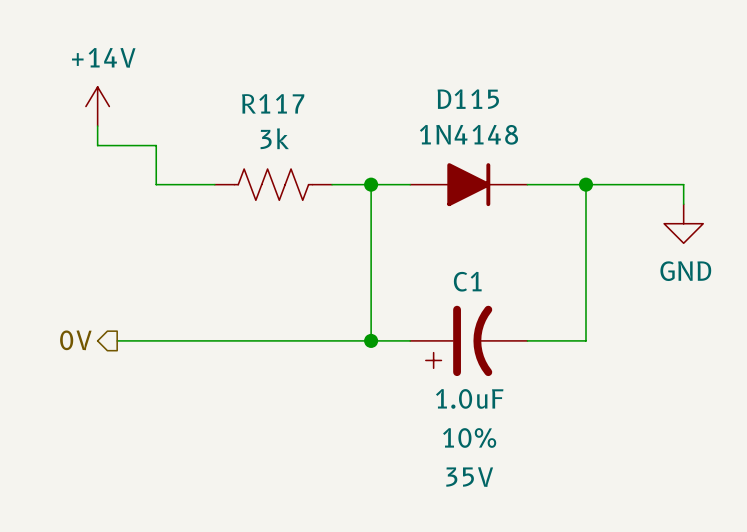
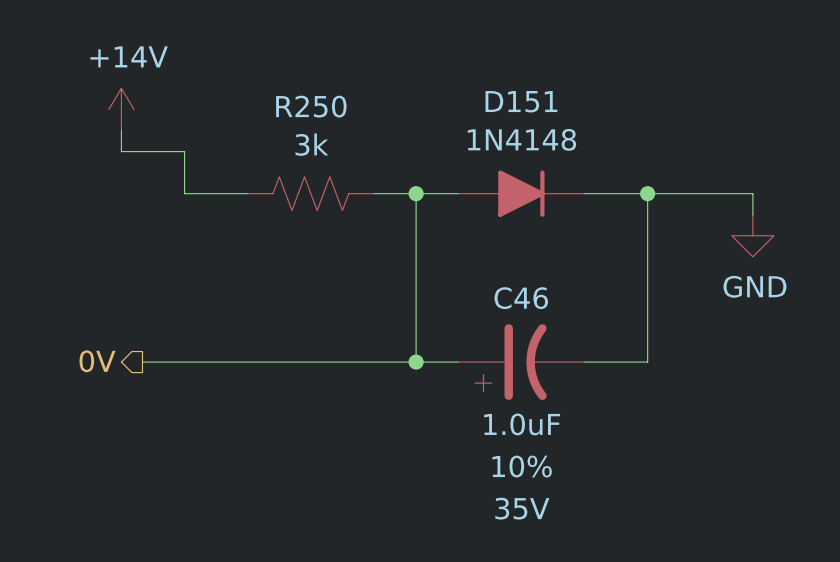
D115 name: D115 (468, 99) -> D151 (521, 101)
R117 name: R117 (273, 103) -> R250 (311, 106)
C1 name: C1 (467, 281) -> C46 (521, 298)

